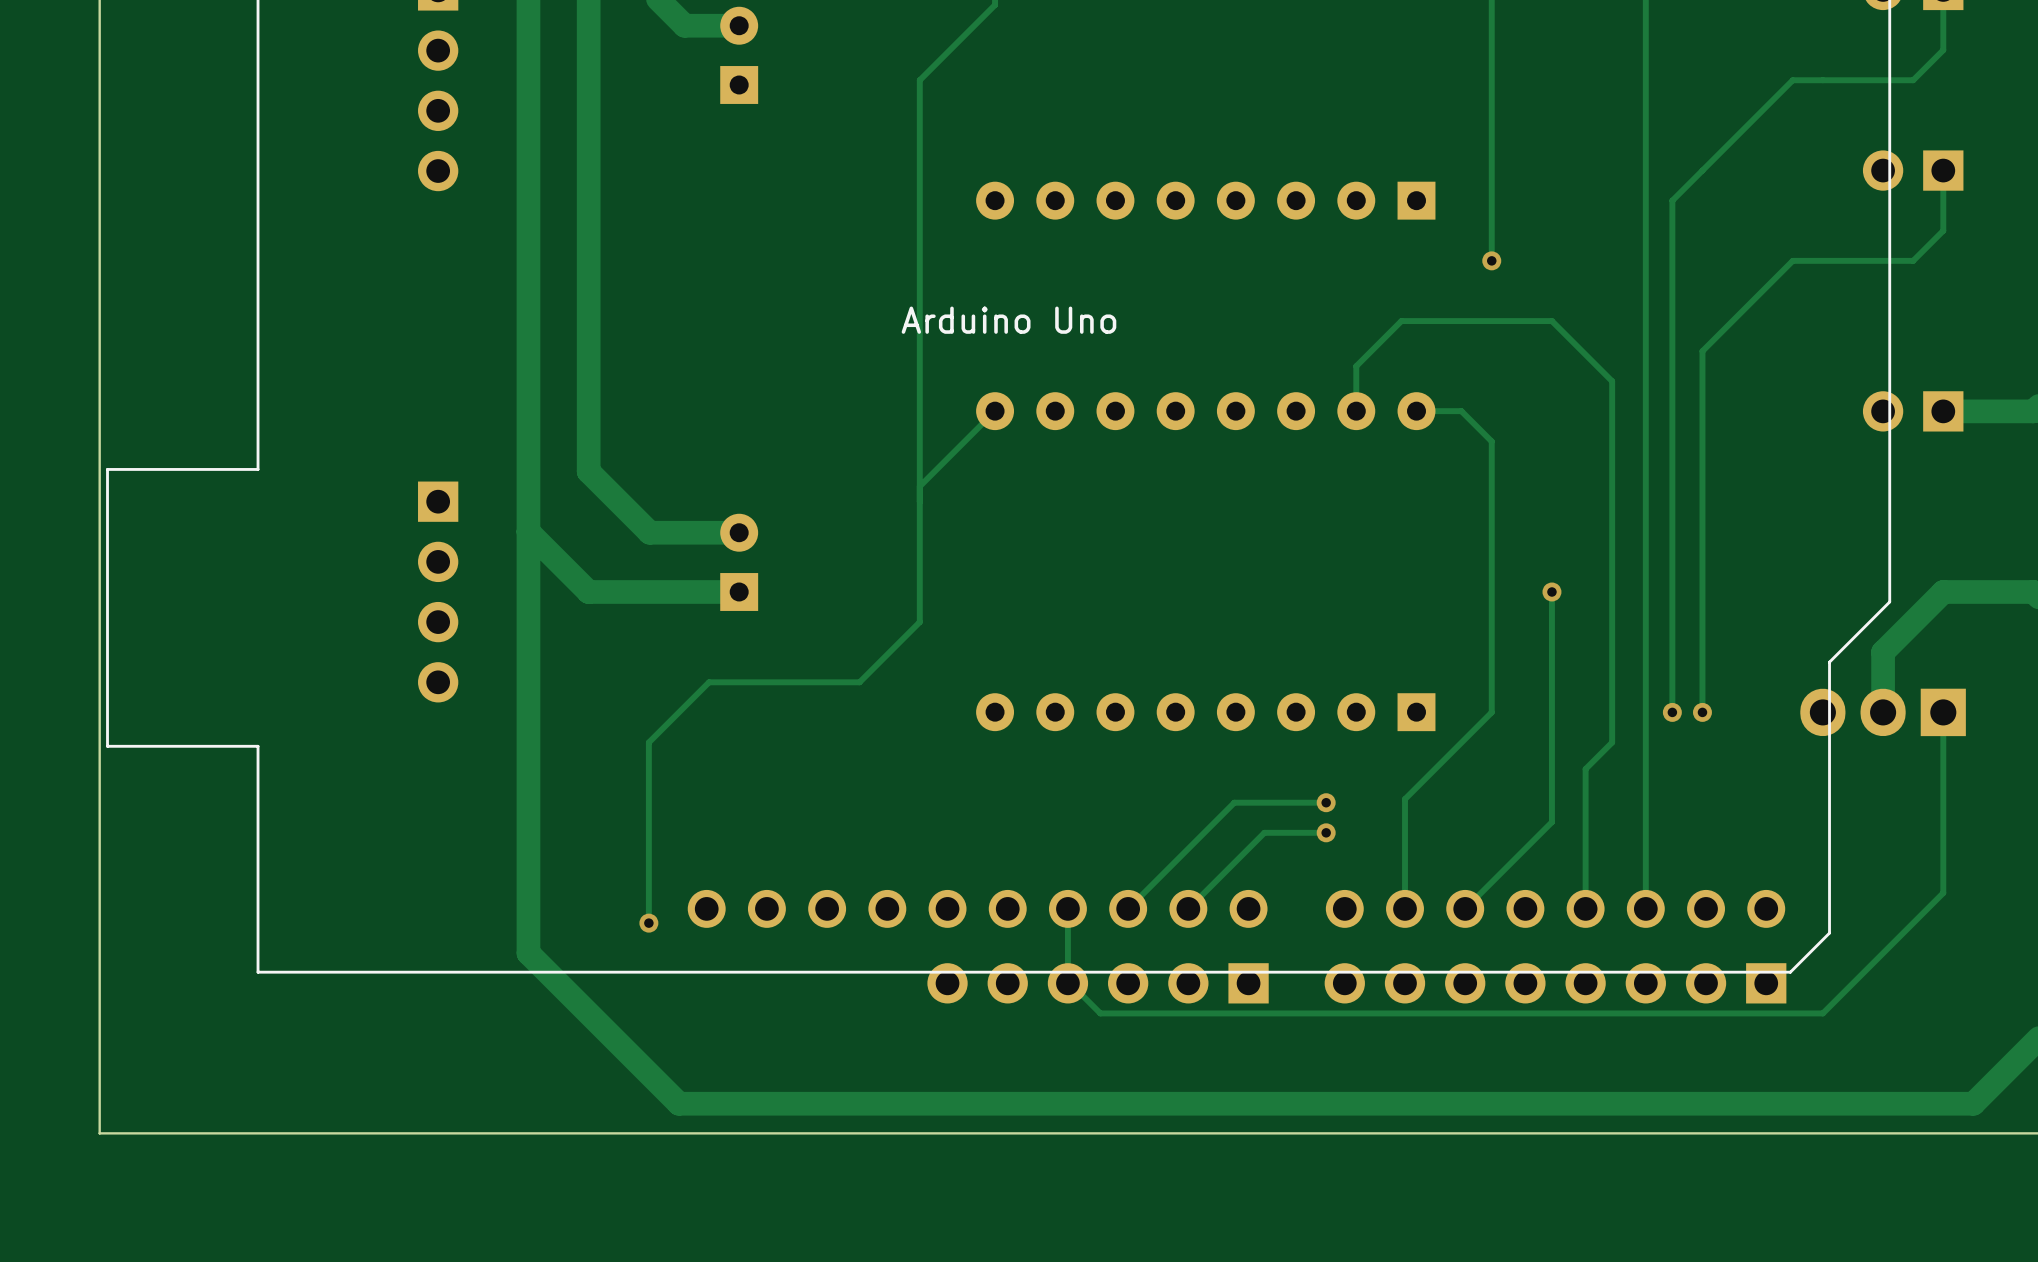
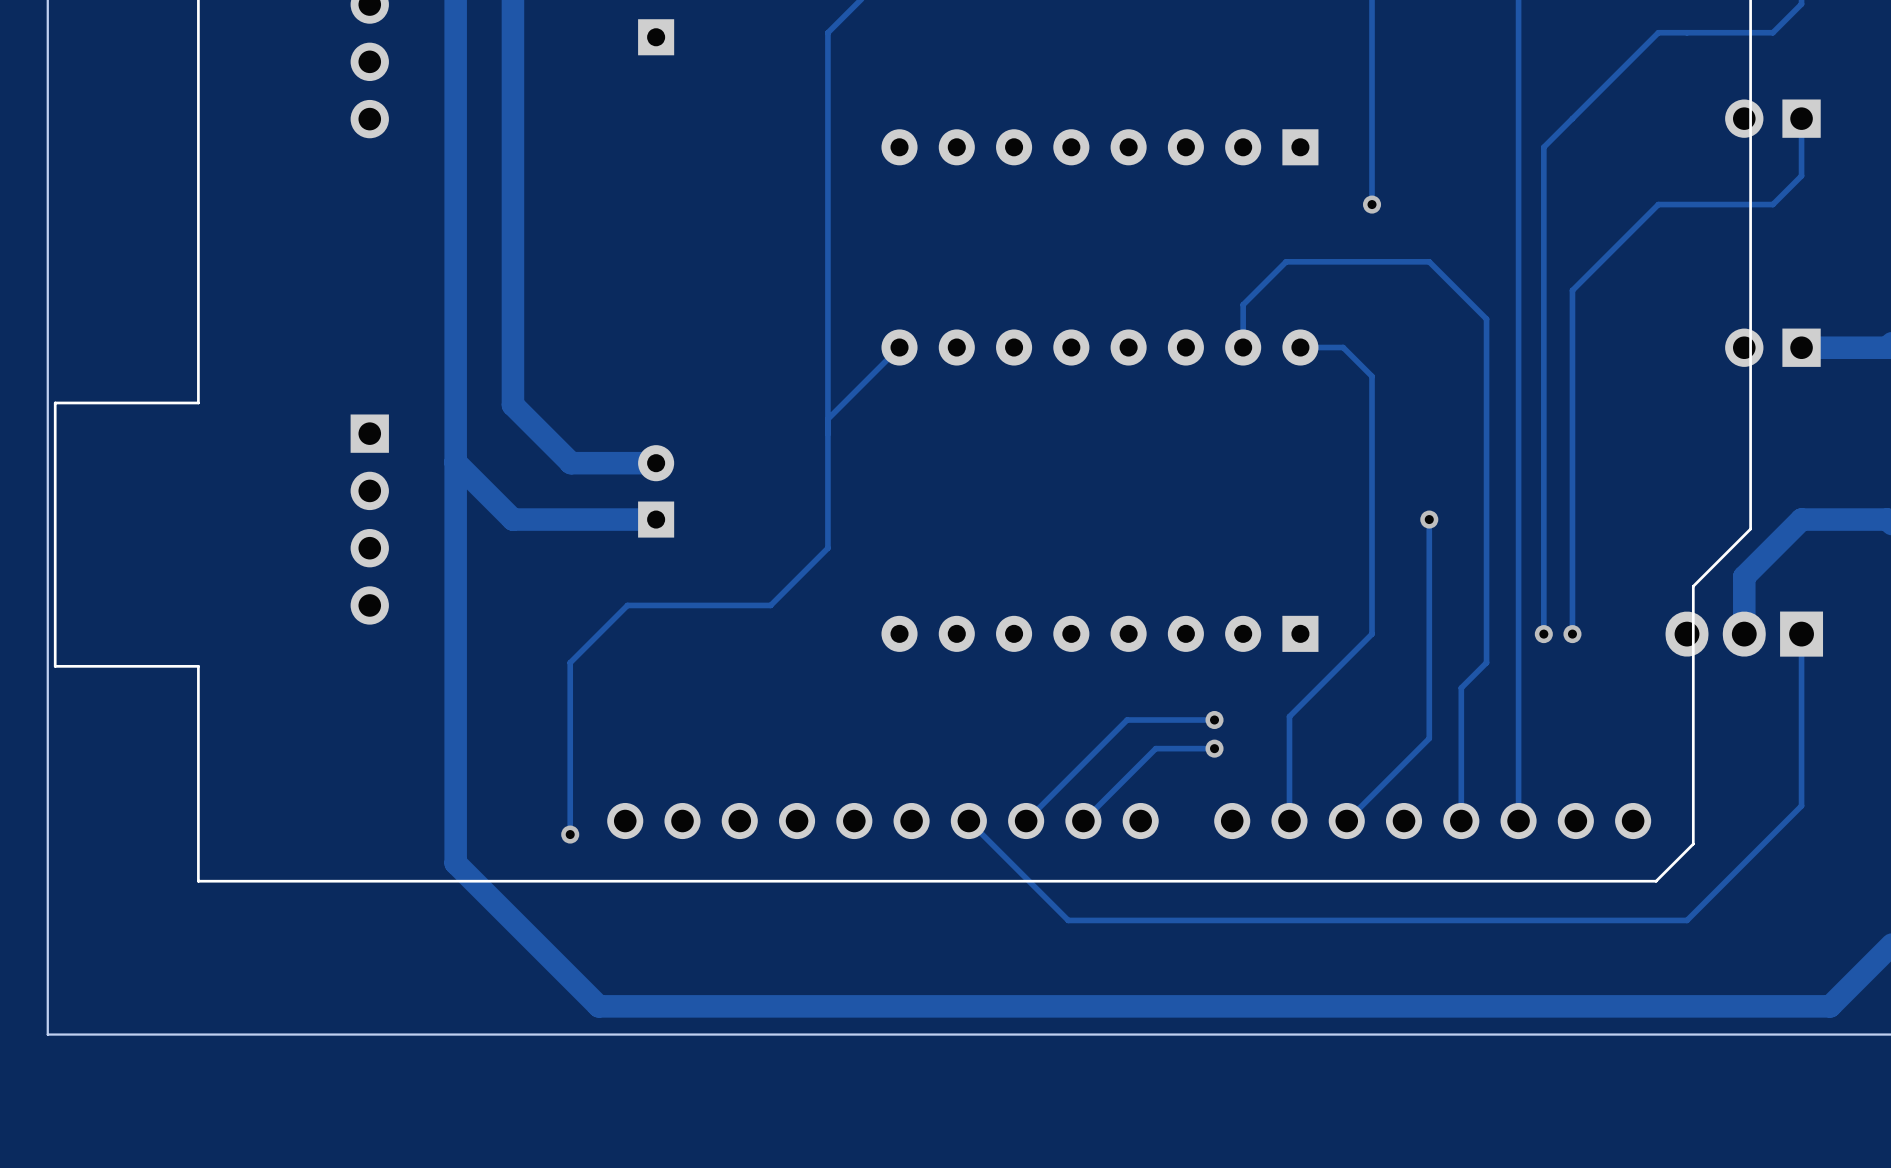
text: Arduino Uno (1008, 320) -> none
track: (1067, 908) (1067, 980) (1100, 1013) (1172, 1013) -> (968, 821) (1068, 920)
part: (1098, 983) -> none
part: (1555, 983) -> none

